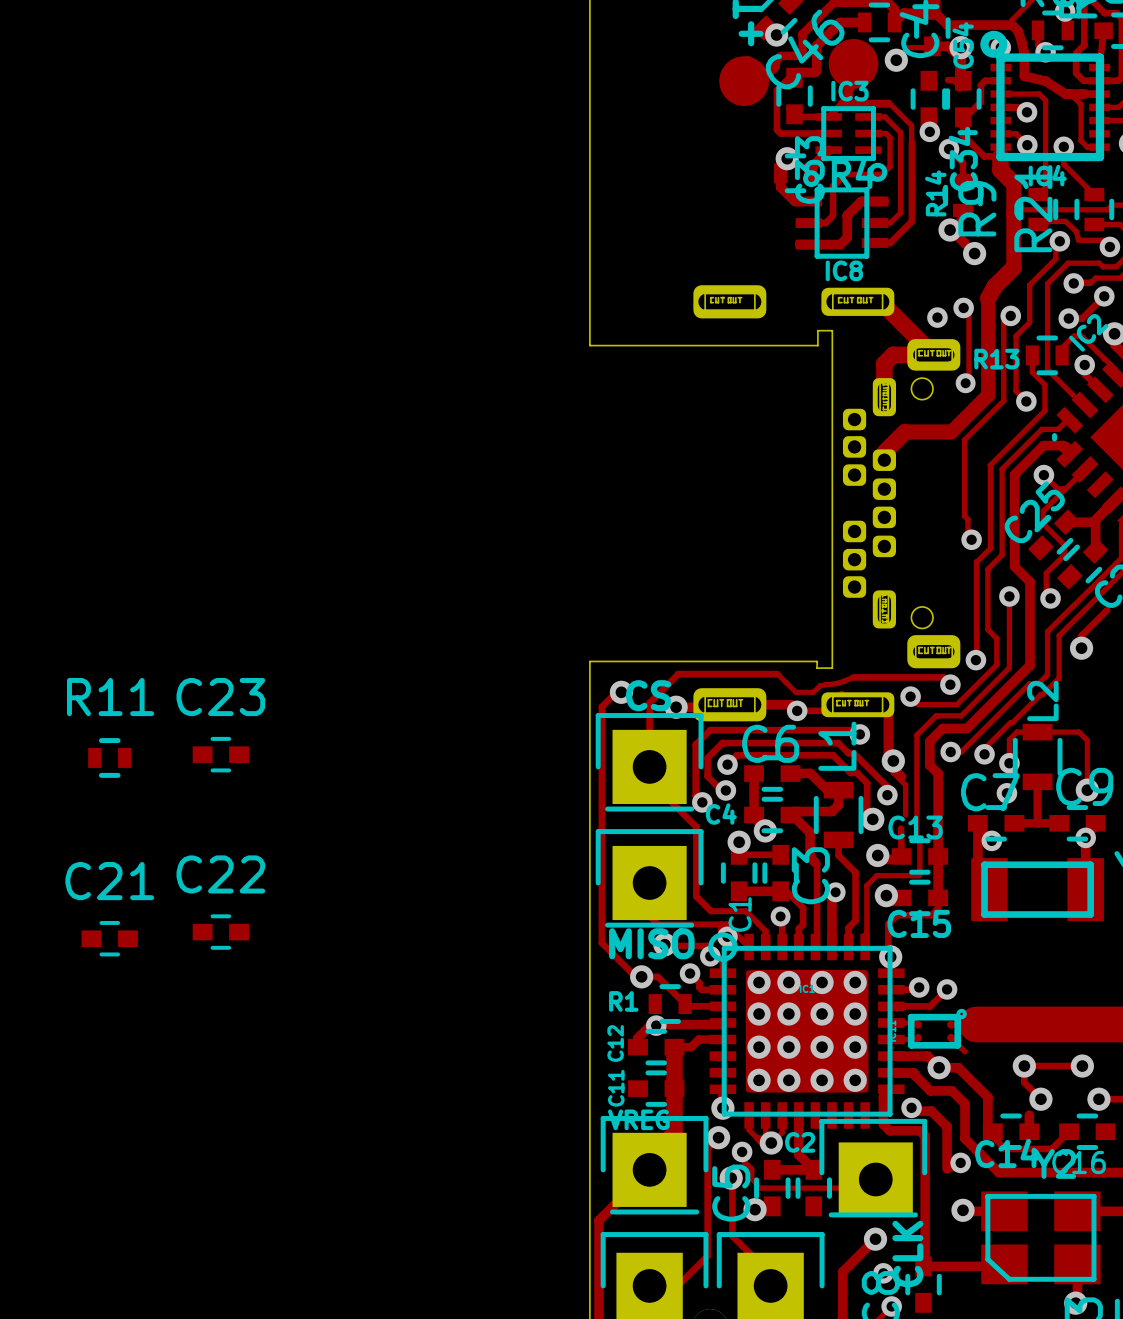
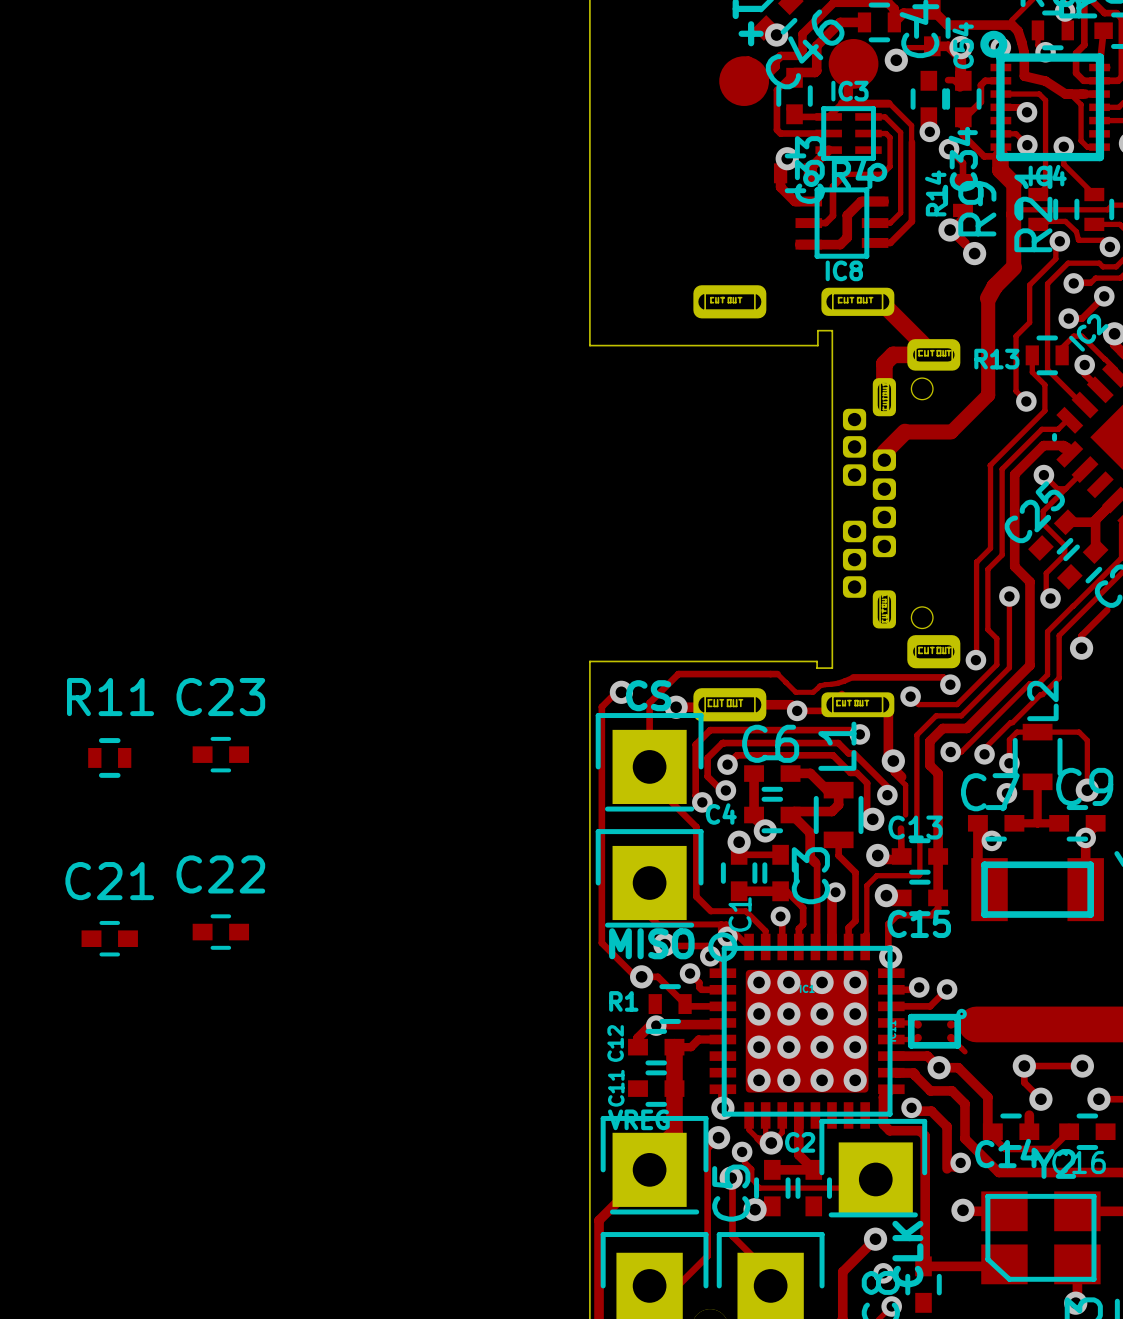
track: (963, 307) (968, 313) (968, 376) (965, 383) -> none
via: (963, 307) -> none
track: (1010, 315) (1003, 322) (1003, 400) (964, 439) (964, 516) (967, 519) (967, 536) (971, 539) -> none
via: (1010, 315) -> none
via: (937, 317) -> none
via: (965, 383) -> none
via: (971, 539) -> none

